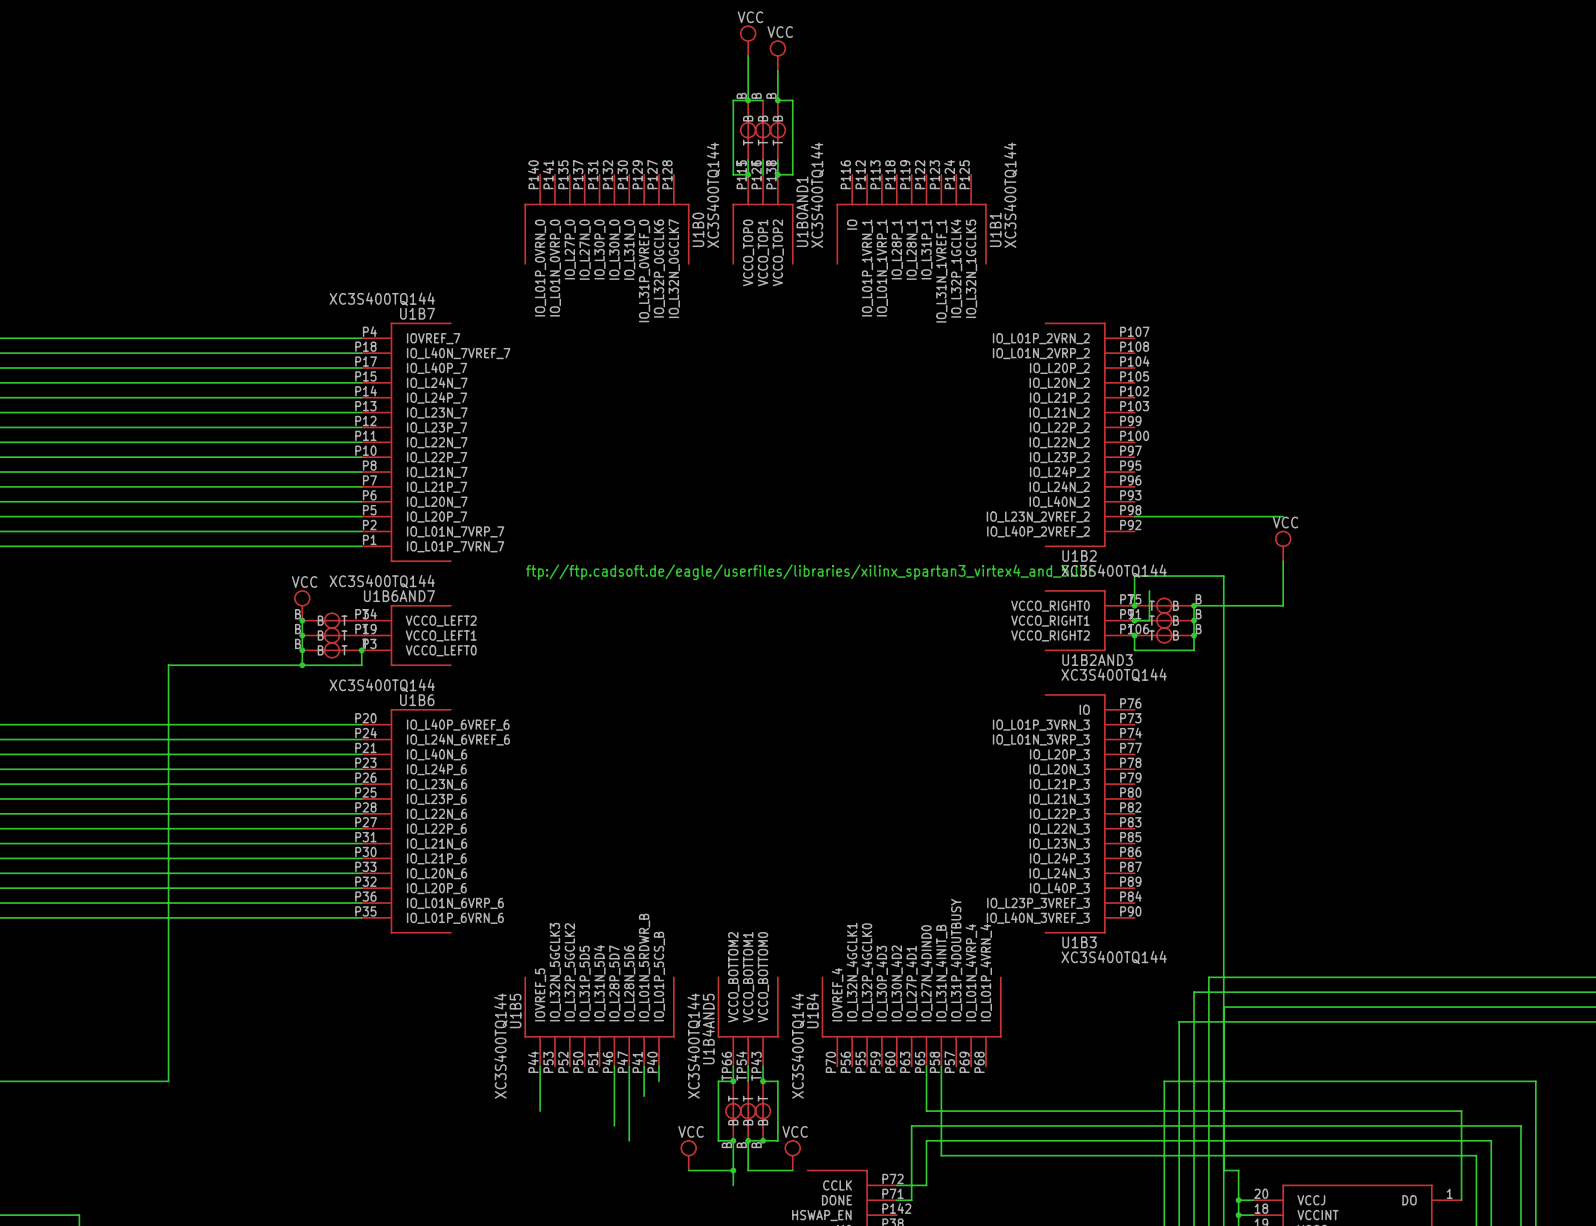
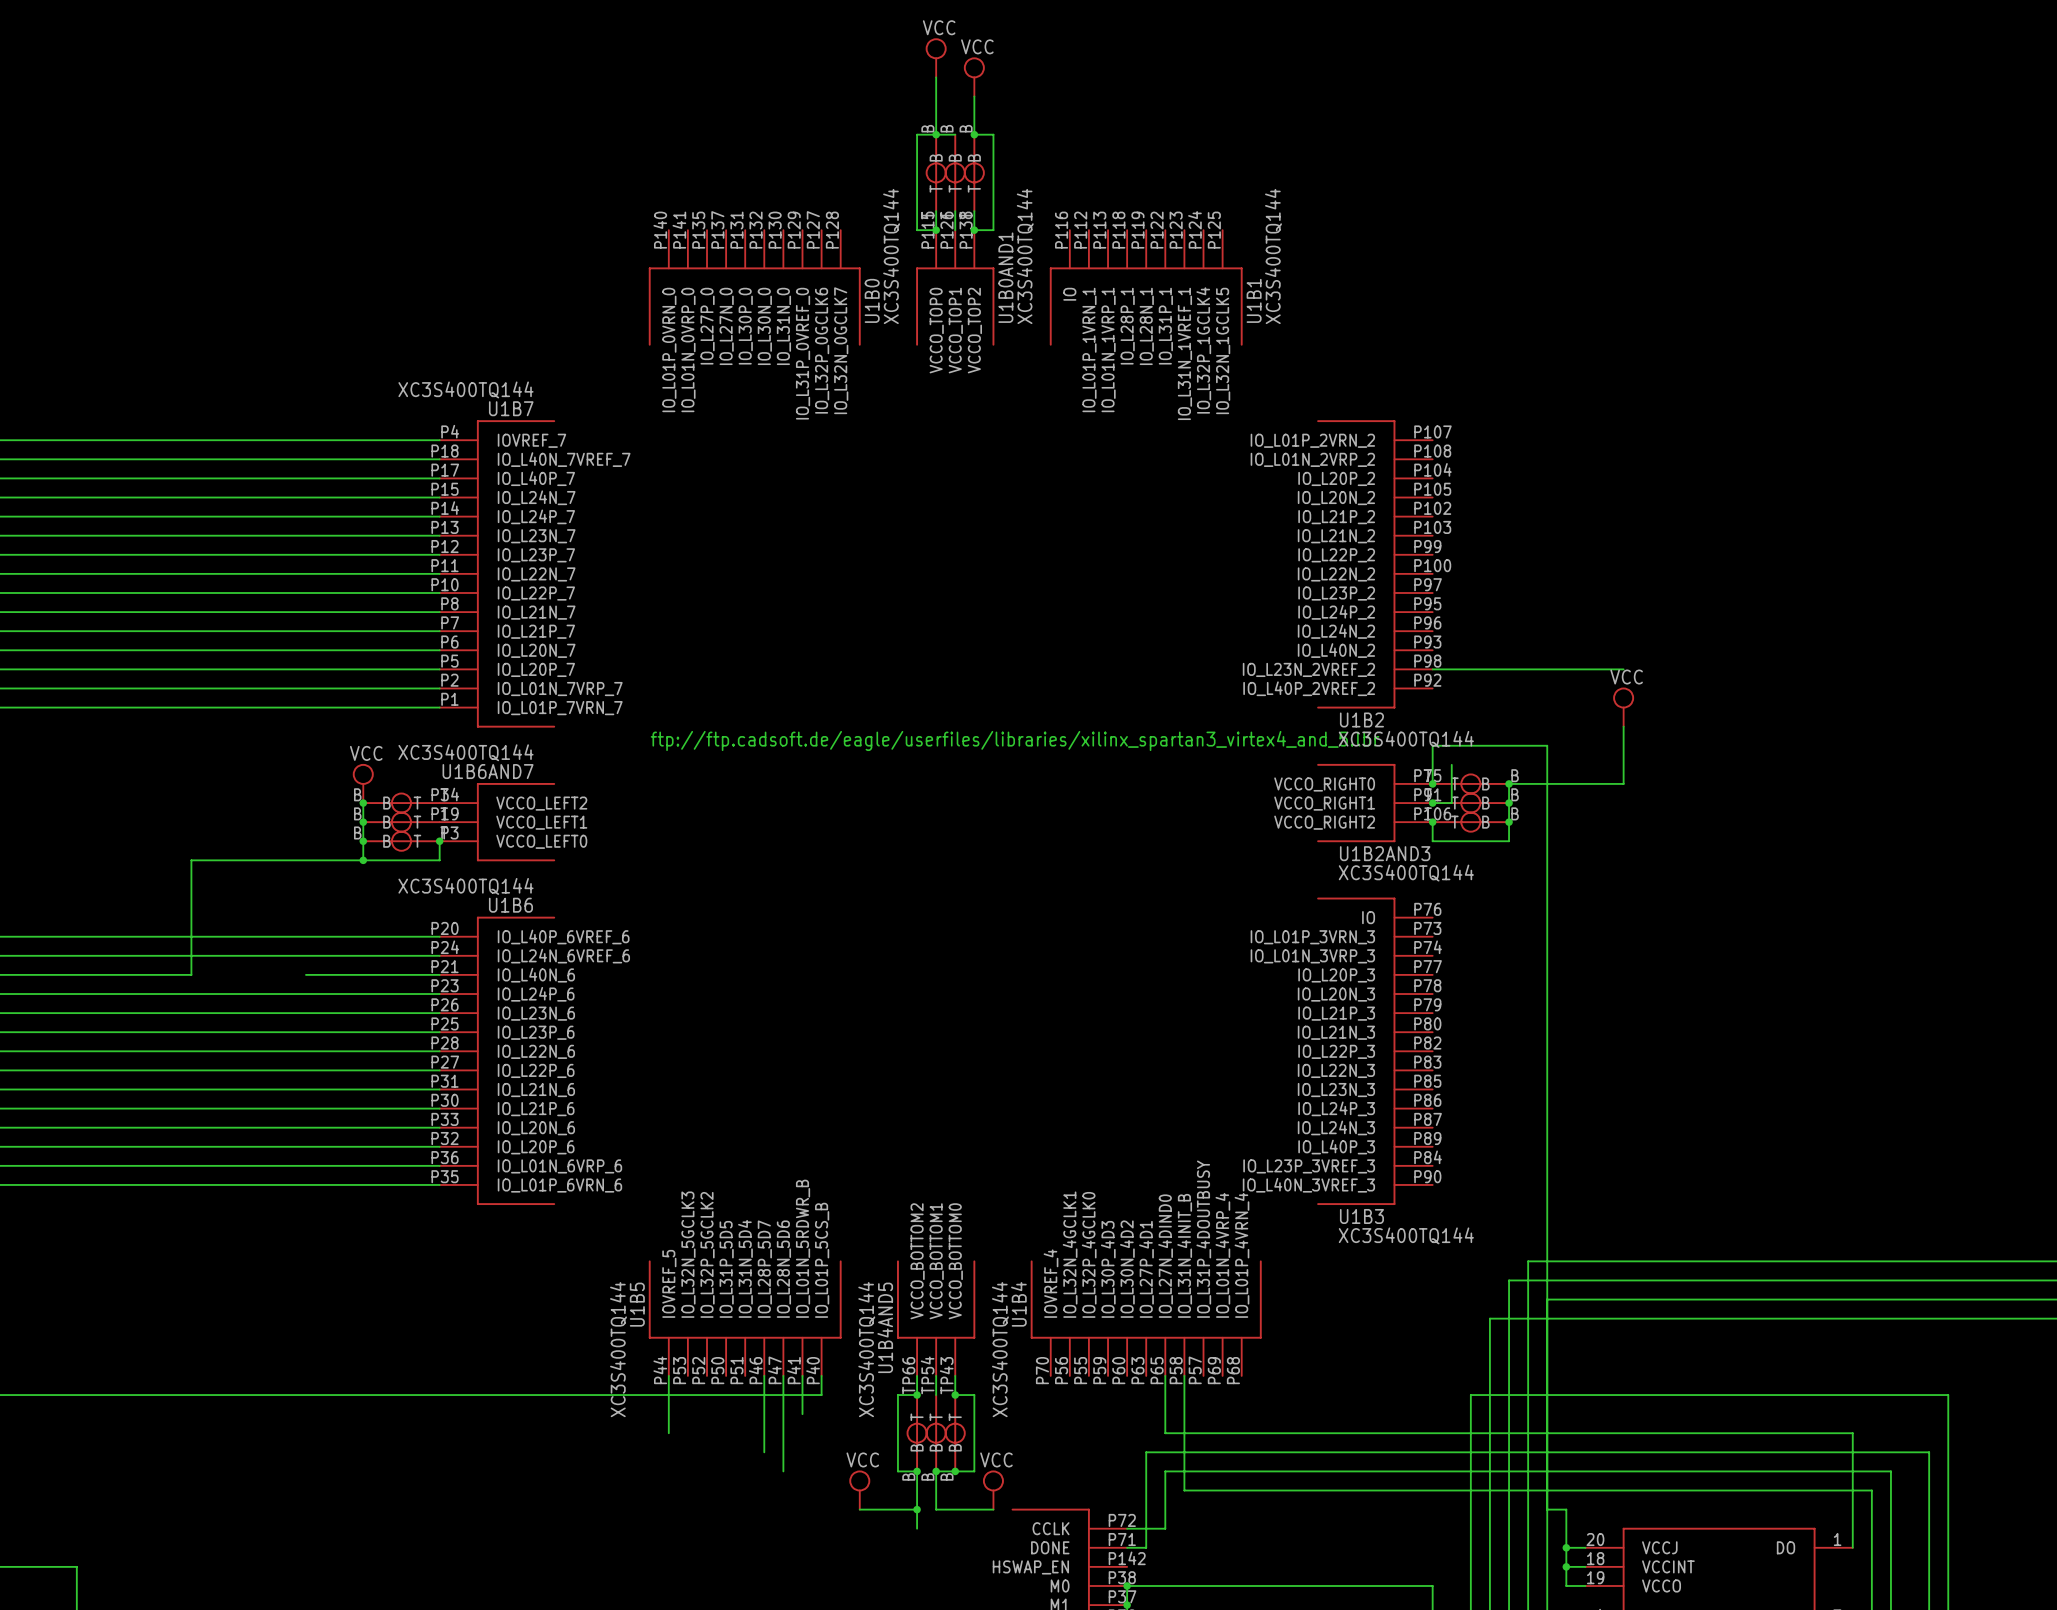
wire: (257, 754) (168, 754) (168, 1081) -> (821, 1395) (191, 1395)

